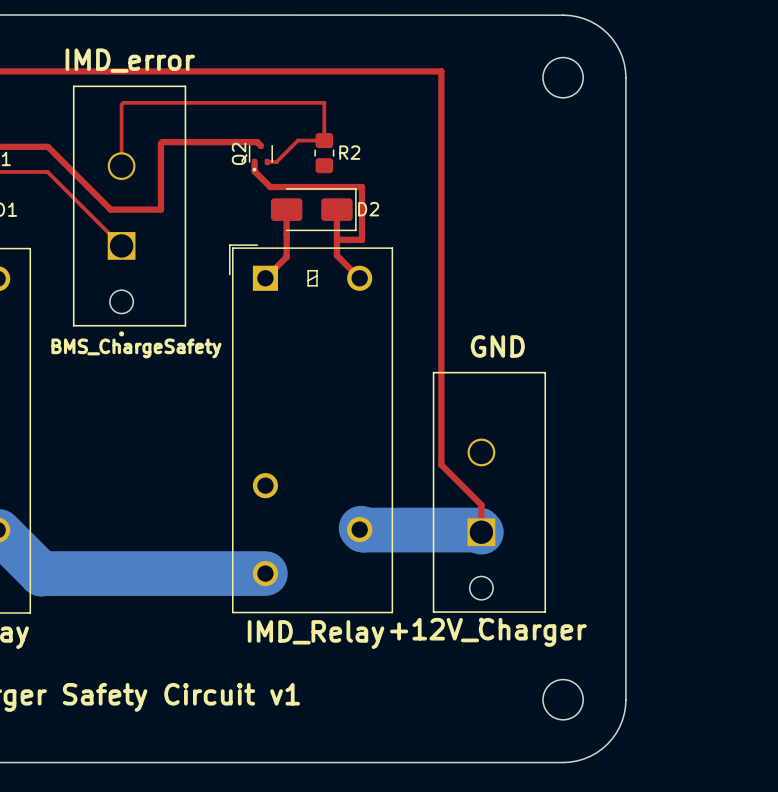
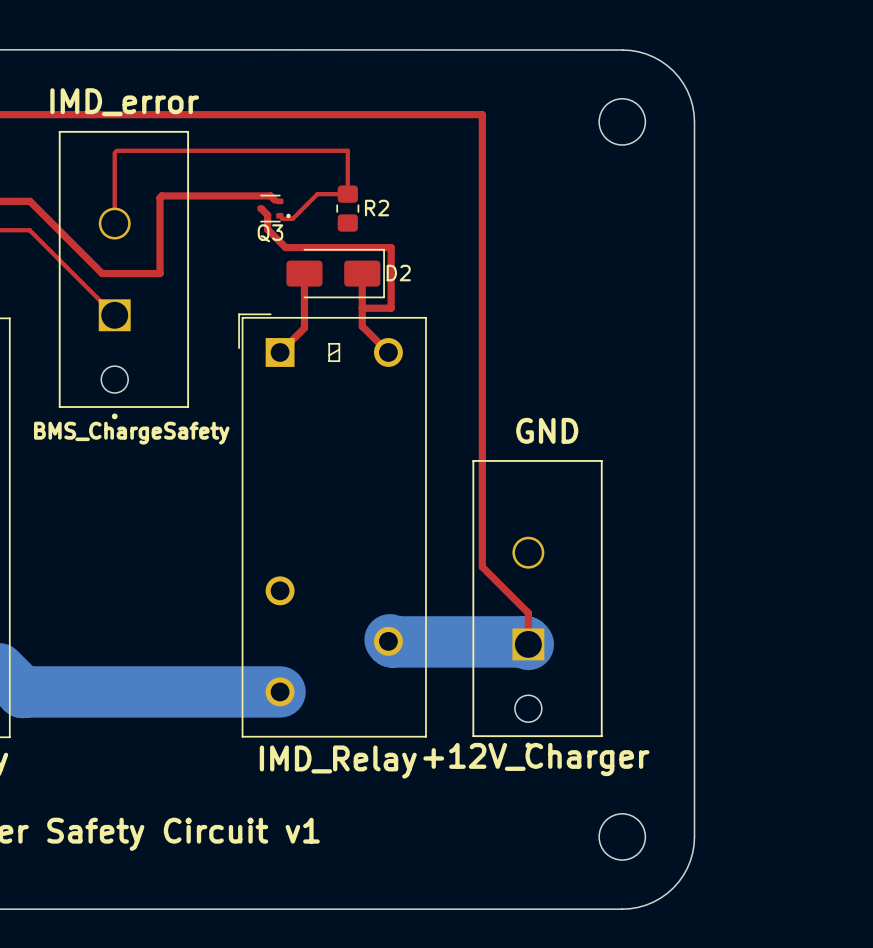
top track: none -> (261, 208) (267, 215) (267, 218)
Q3: none -> (274, 208)
Q2: (260, 157) -> none

